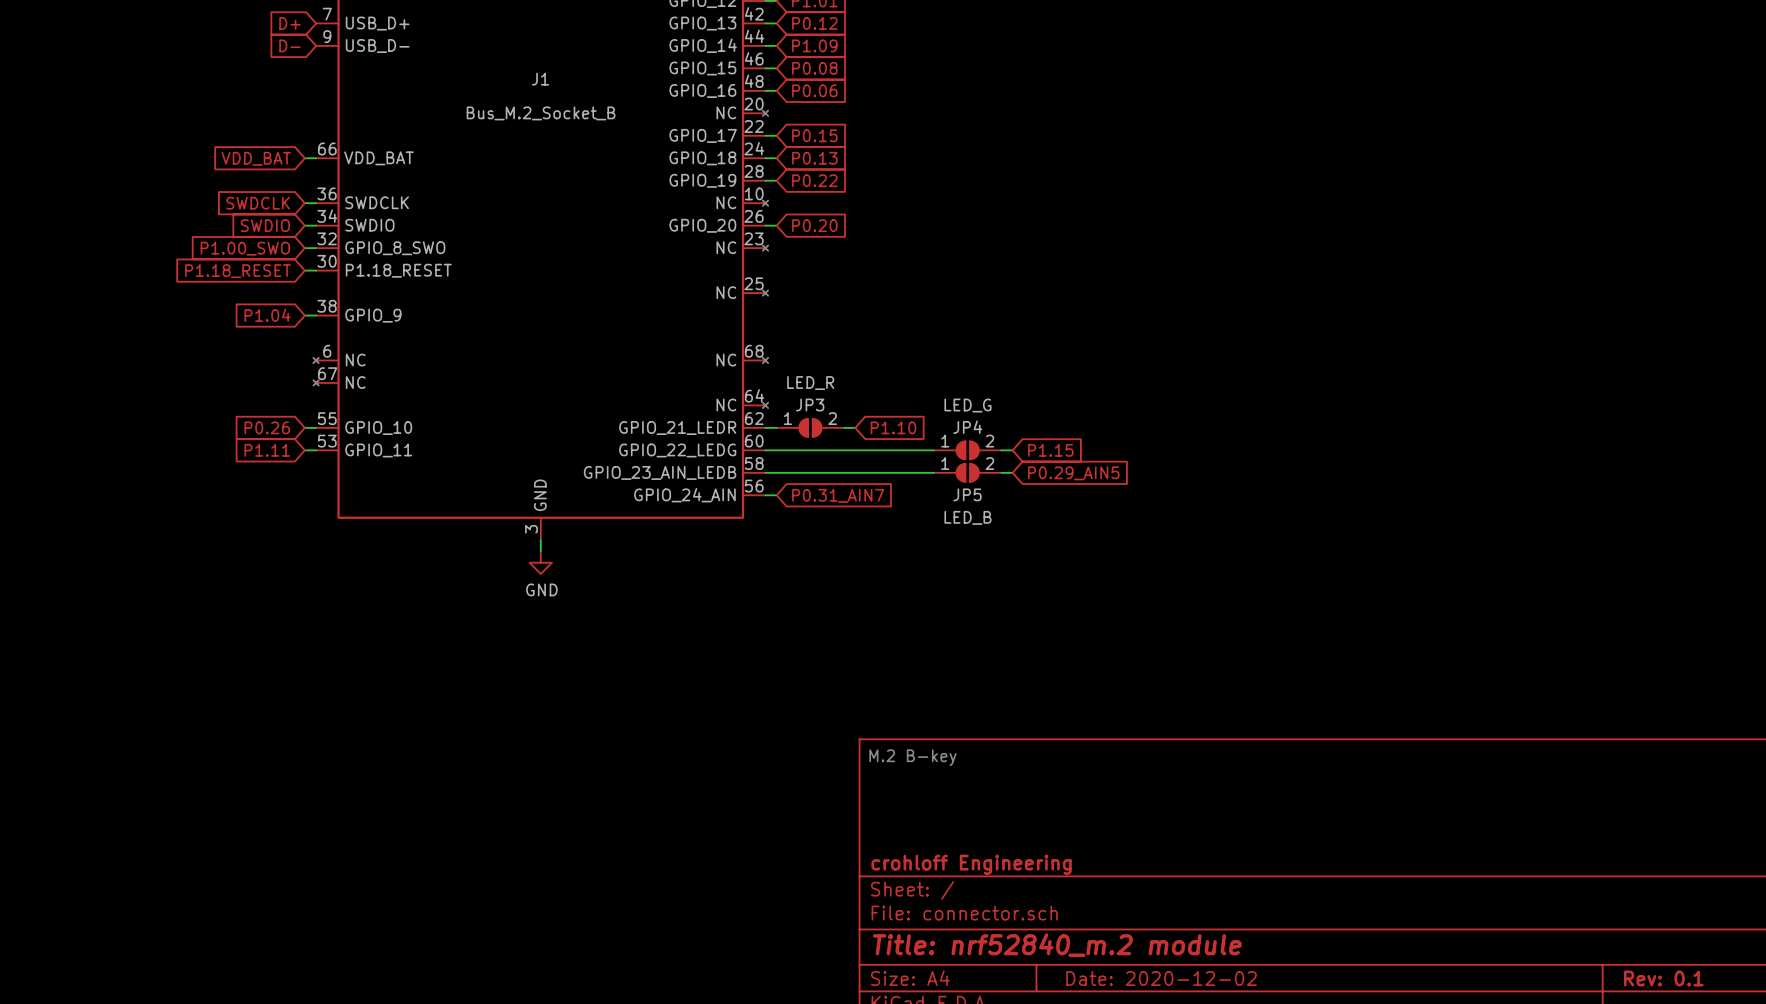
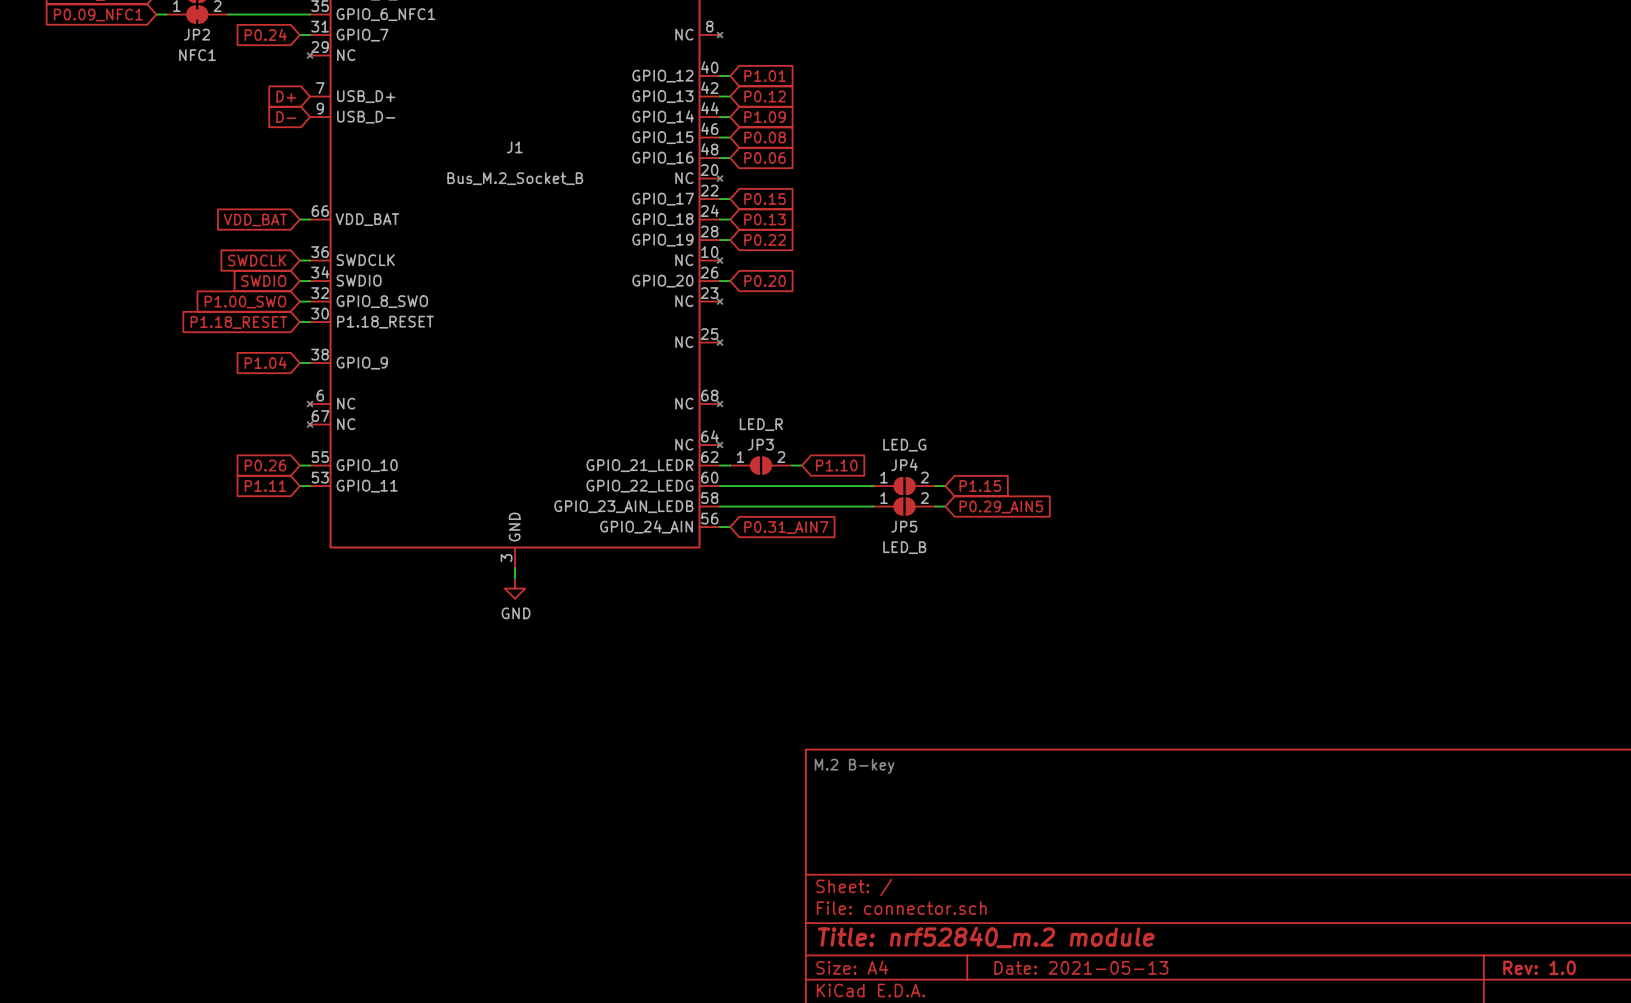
title block: crohloff Engineering (971, 864) -> none
title block: Date: 2020-12-02 (1161, 978) -> Date: 2021-05-13 (1081, 967)
title block: Rev: 0.1 (1663, 978) -> Rev: 1.0 (1539, 967)

